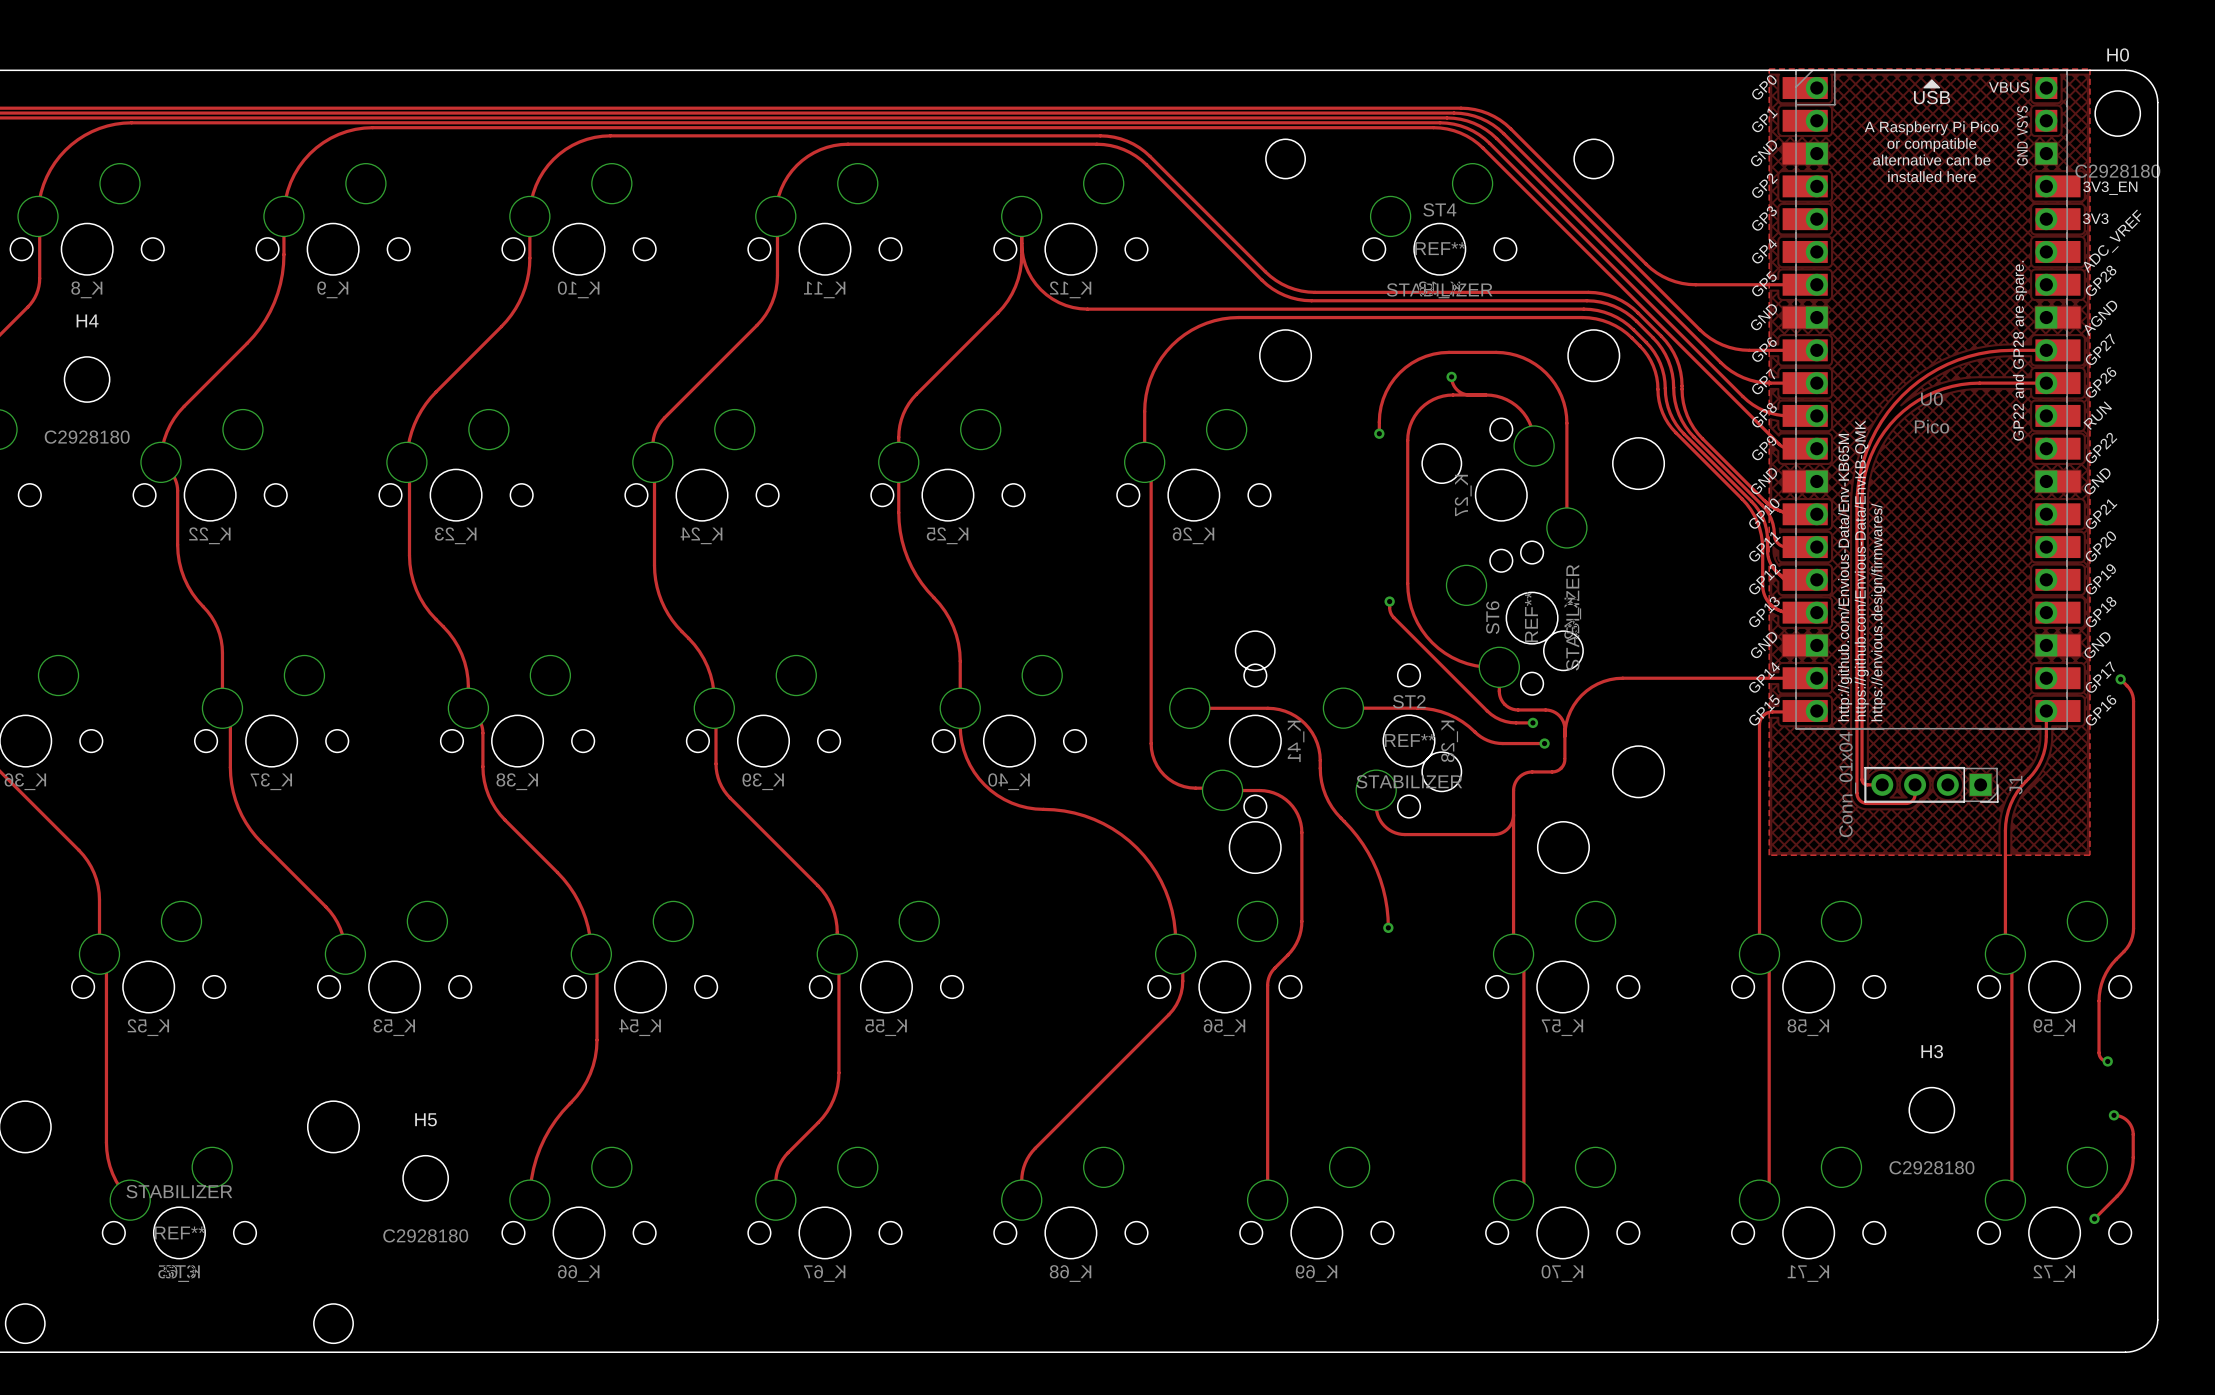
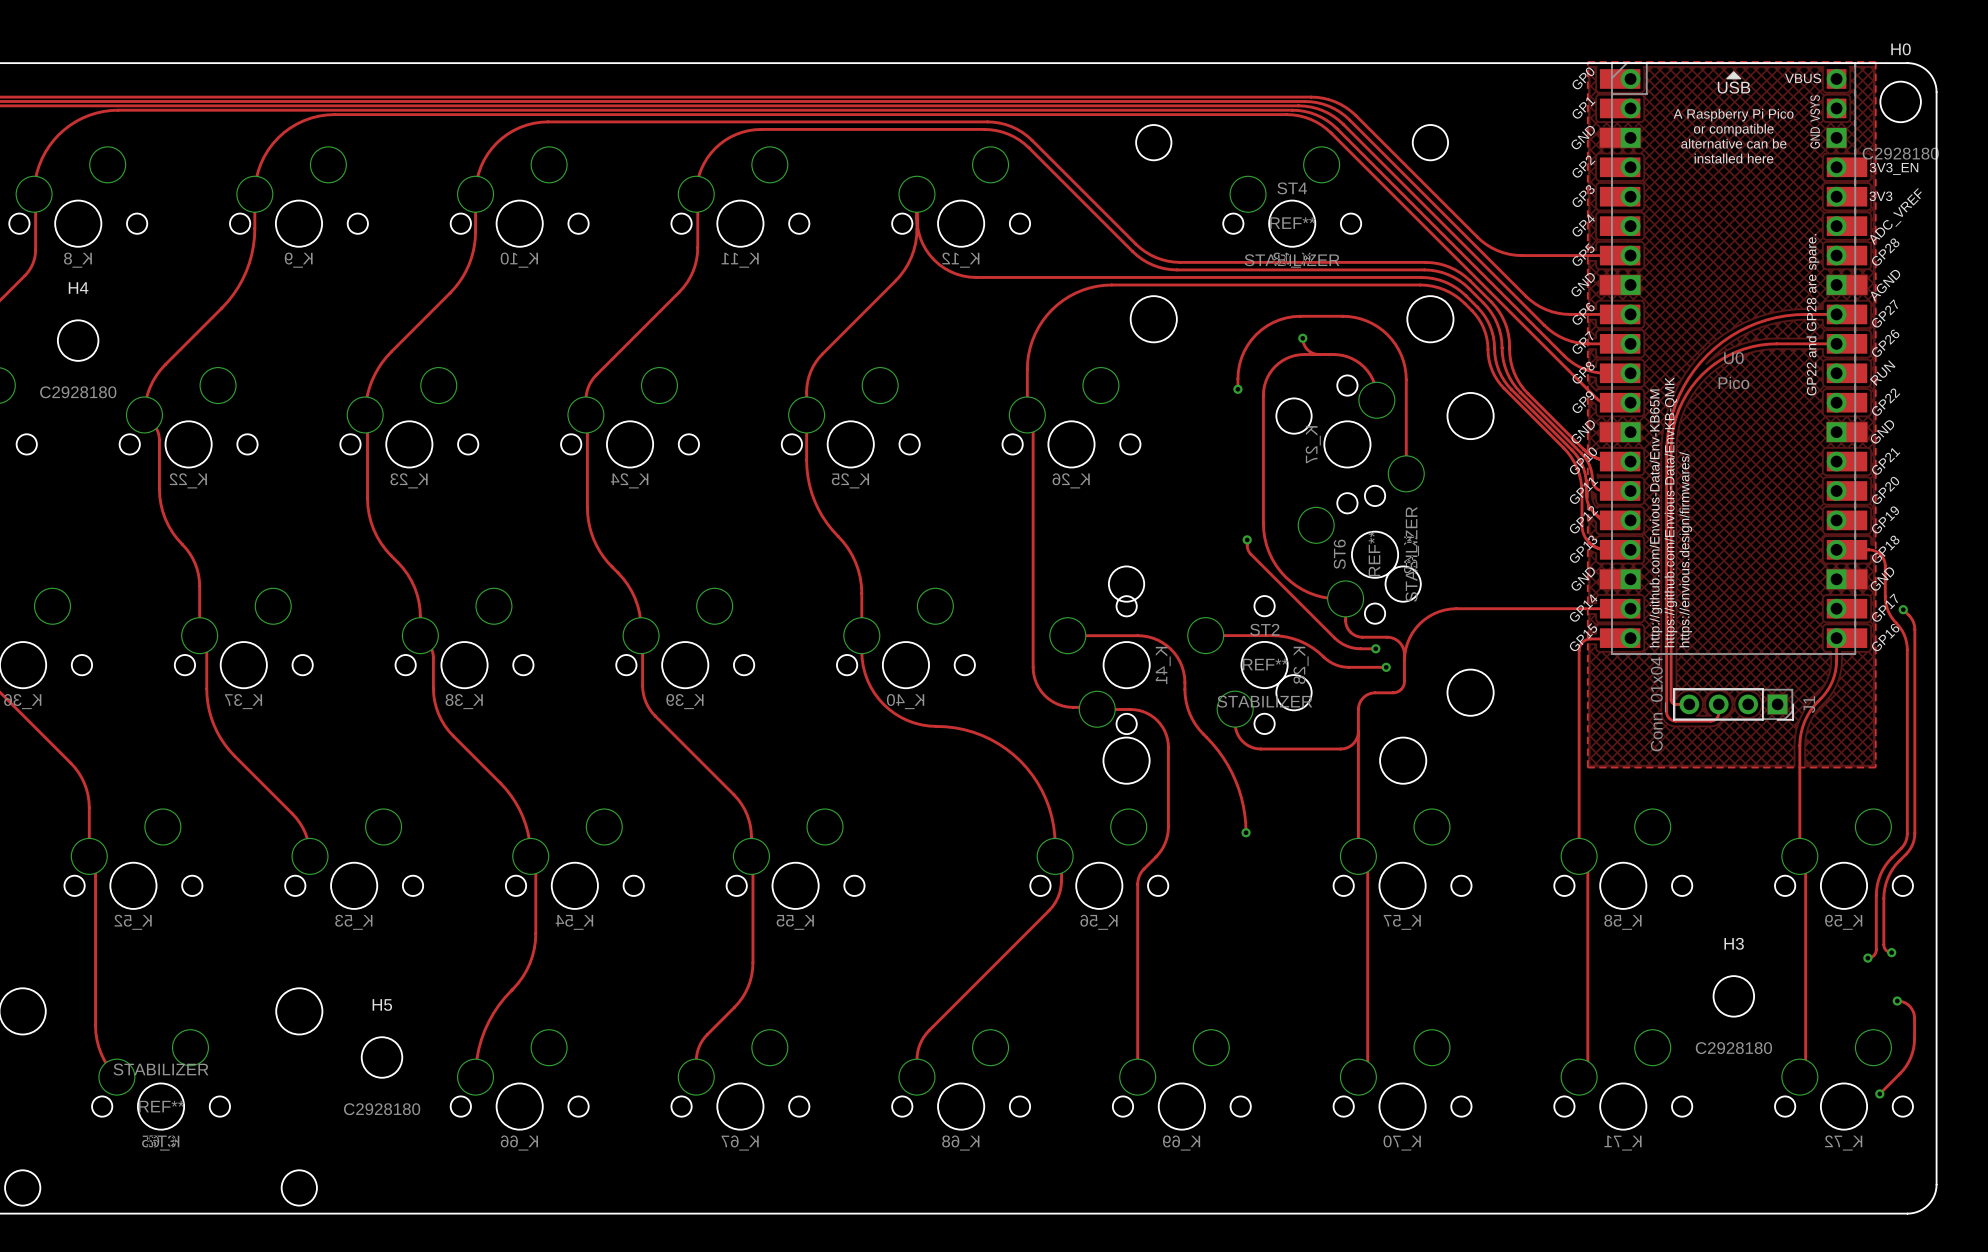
track: none -> (1836, 549) (1871, 549) (1881, 556) (1885, 564) (1886, 607) (1902, 632) (1907, 646) (1907, 835) (1903, 845) (1885, 865) (1878, 879) (1876, 895) (1876, 950) (1873, 955) (1867, 958)
via: none -> (1867, 958)

